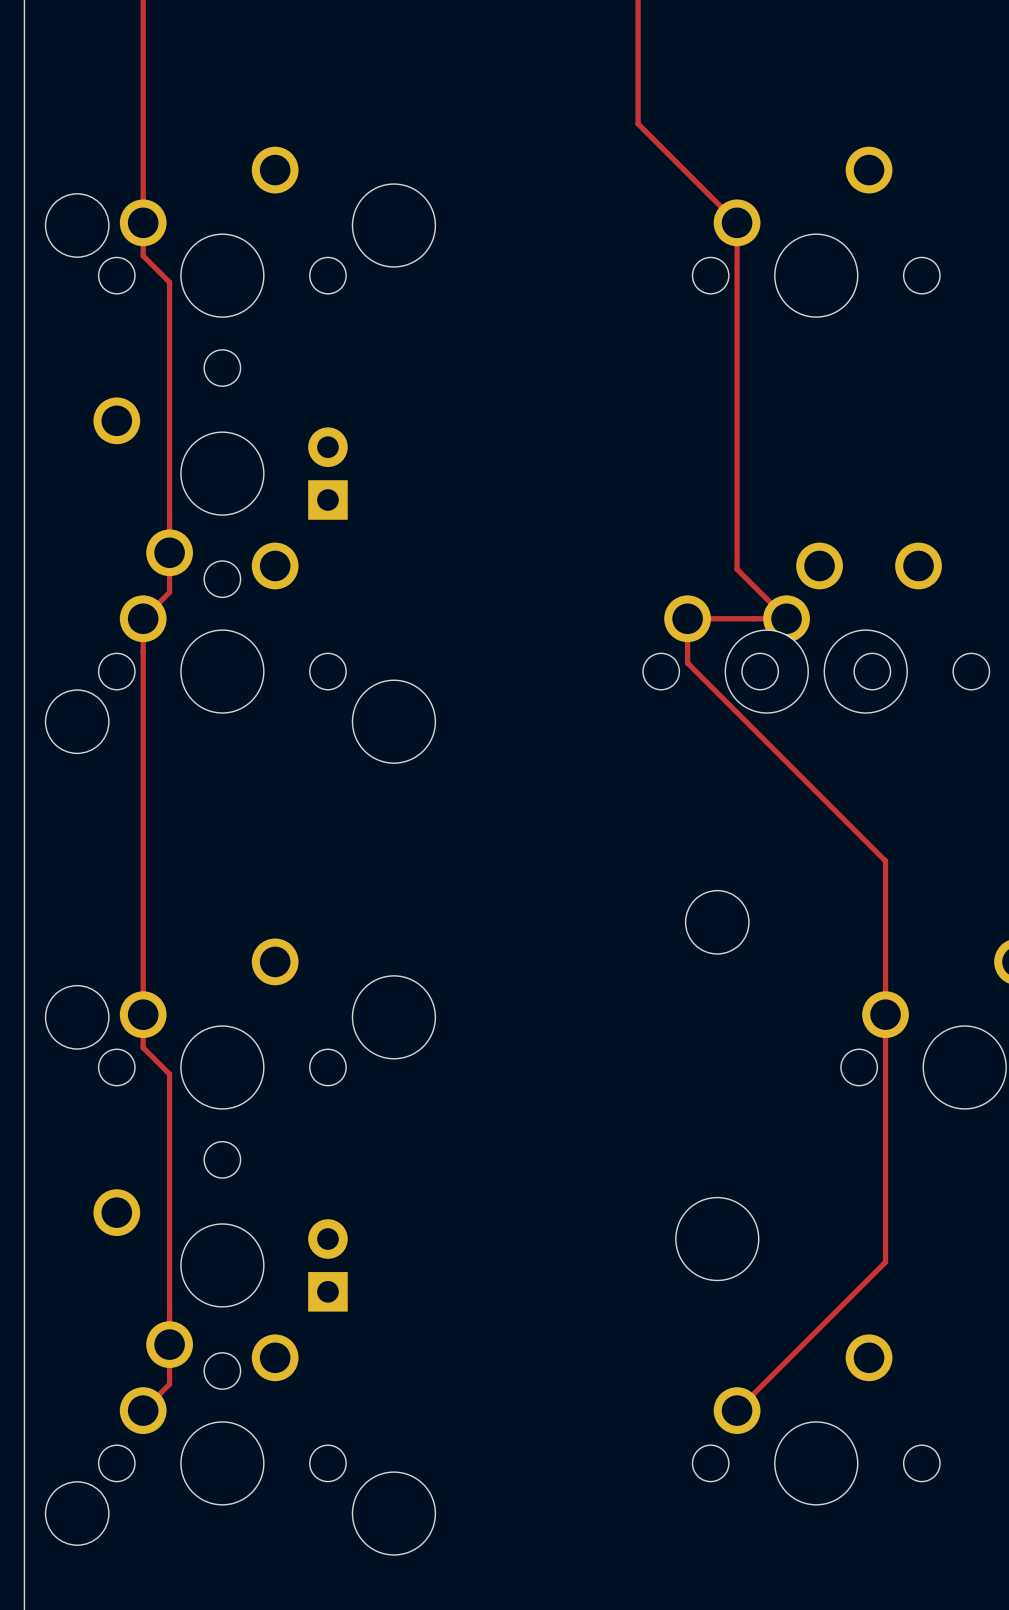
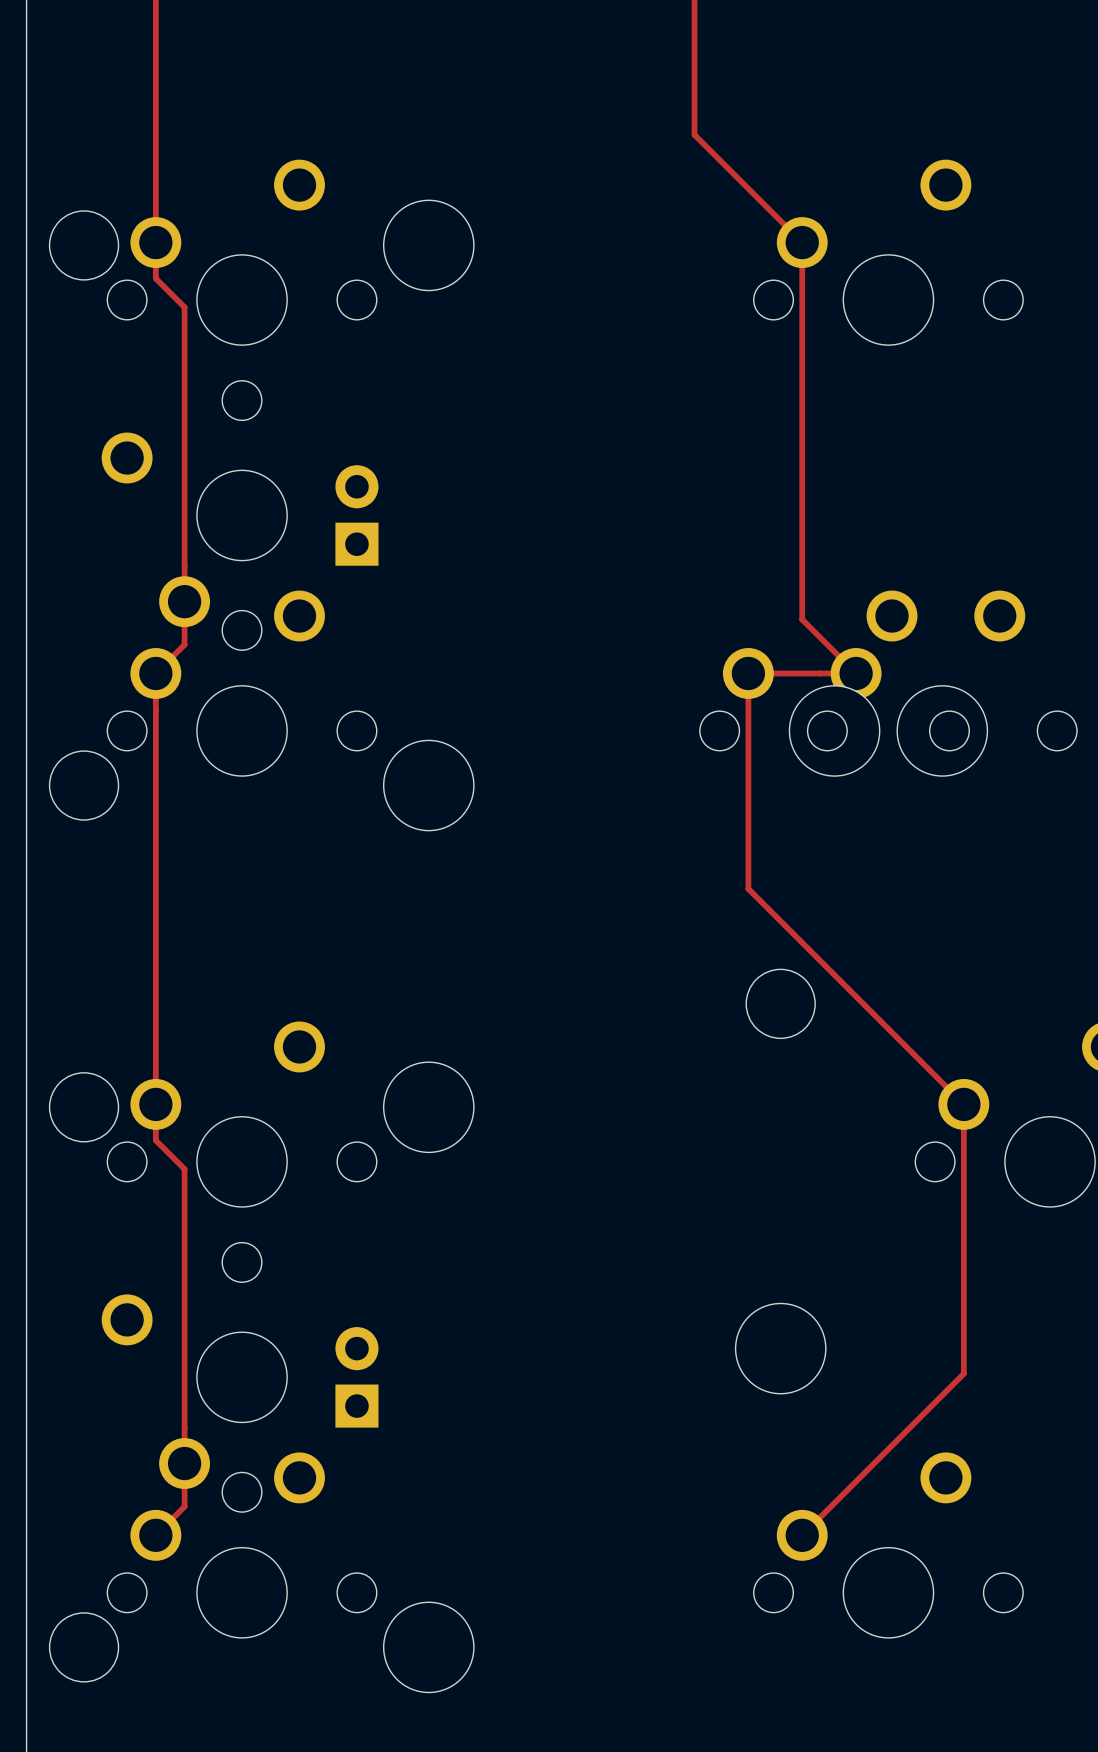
track: (687, 663) (885, 861) (885, 1014) -> (748, 721) (748, 888) (963, 1104)

